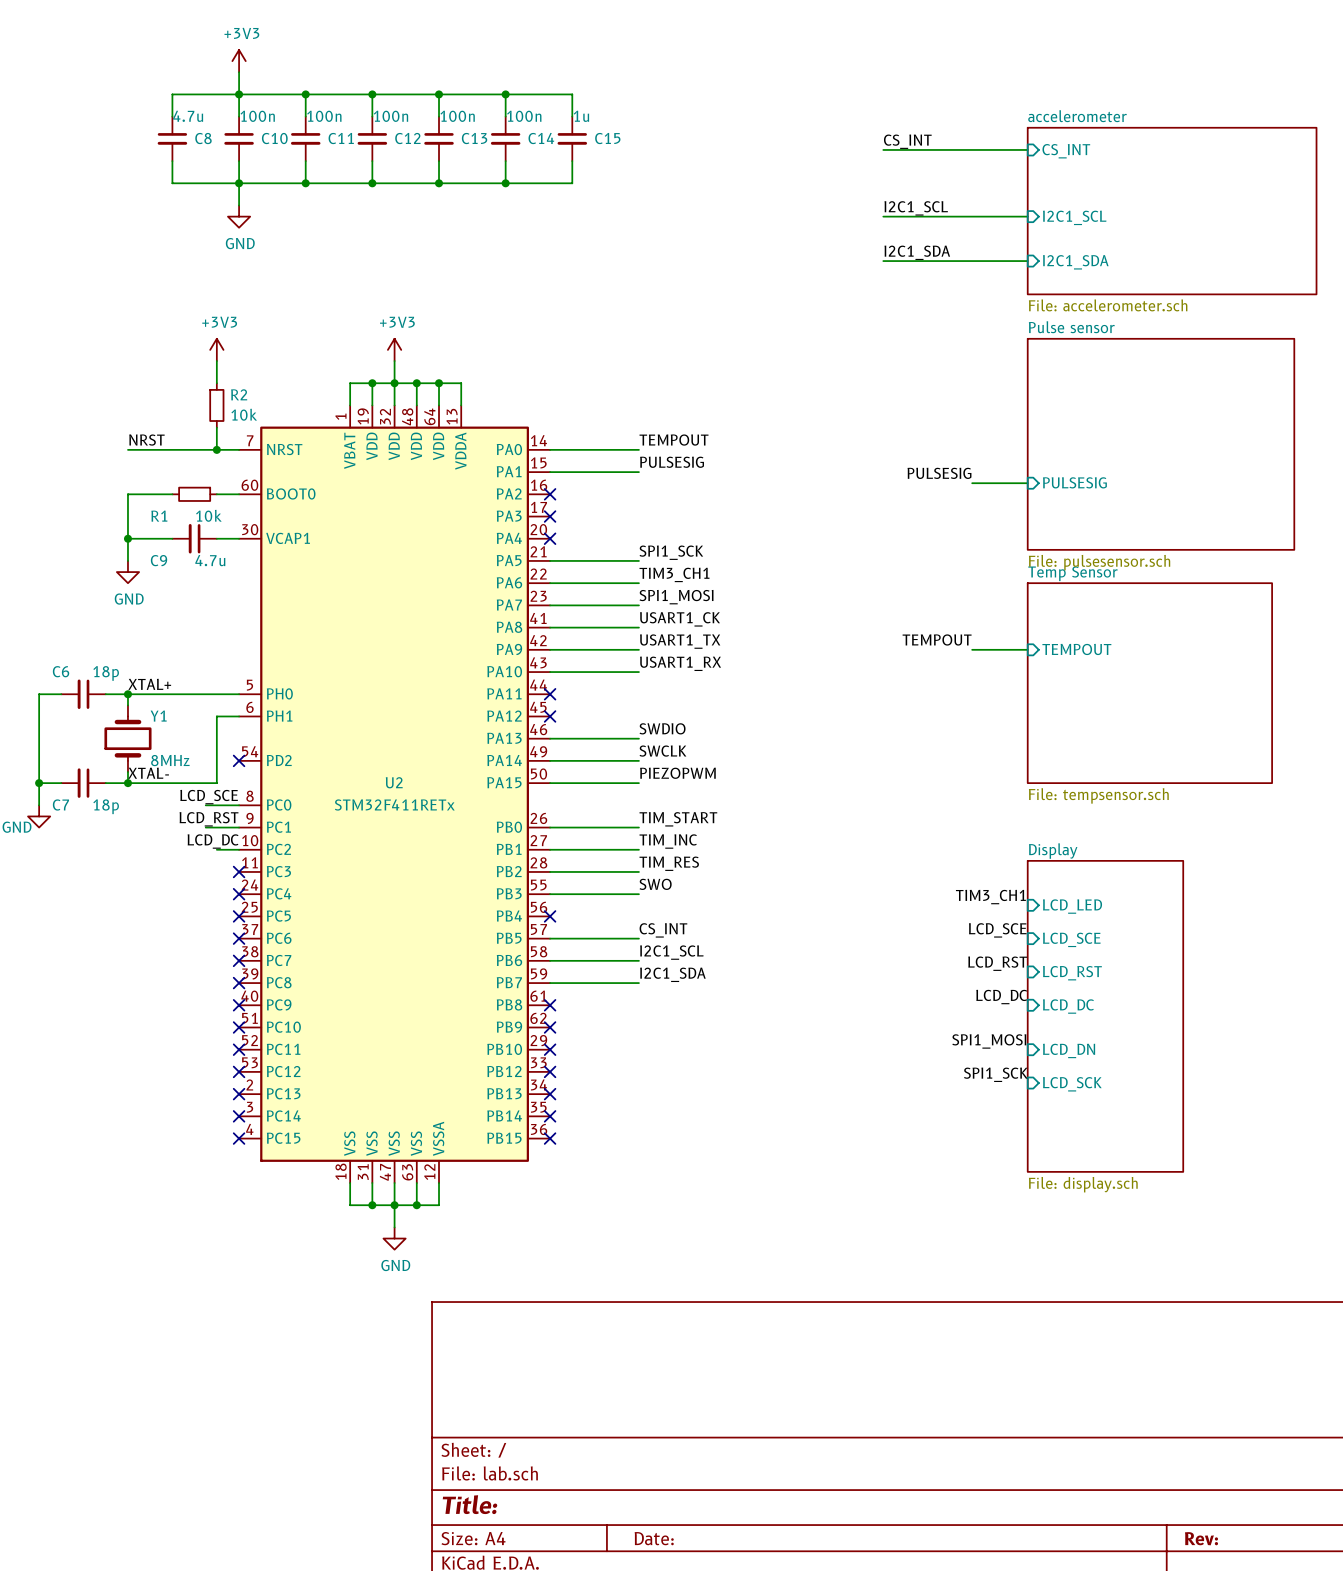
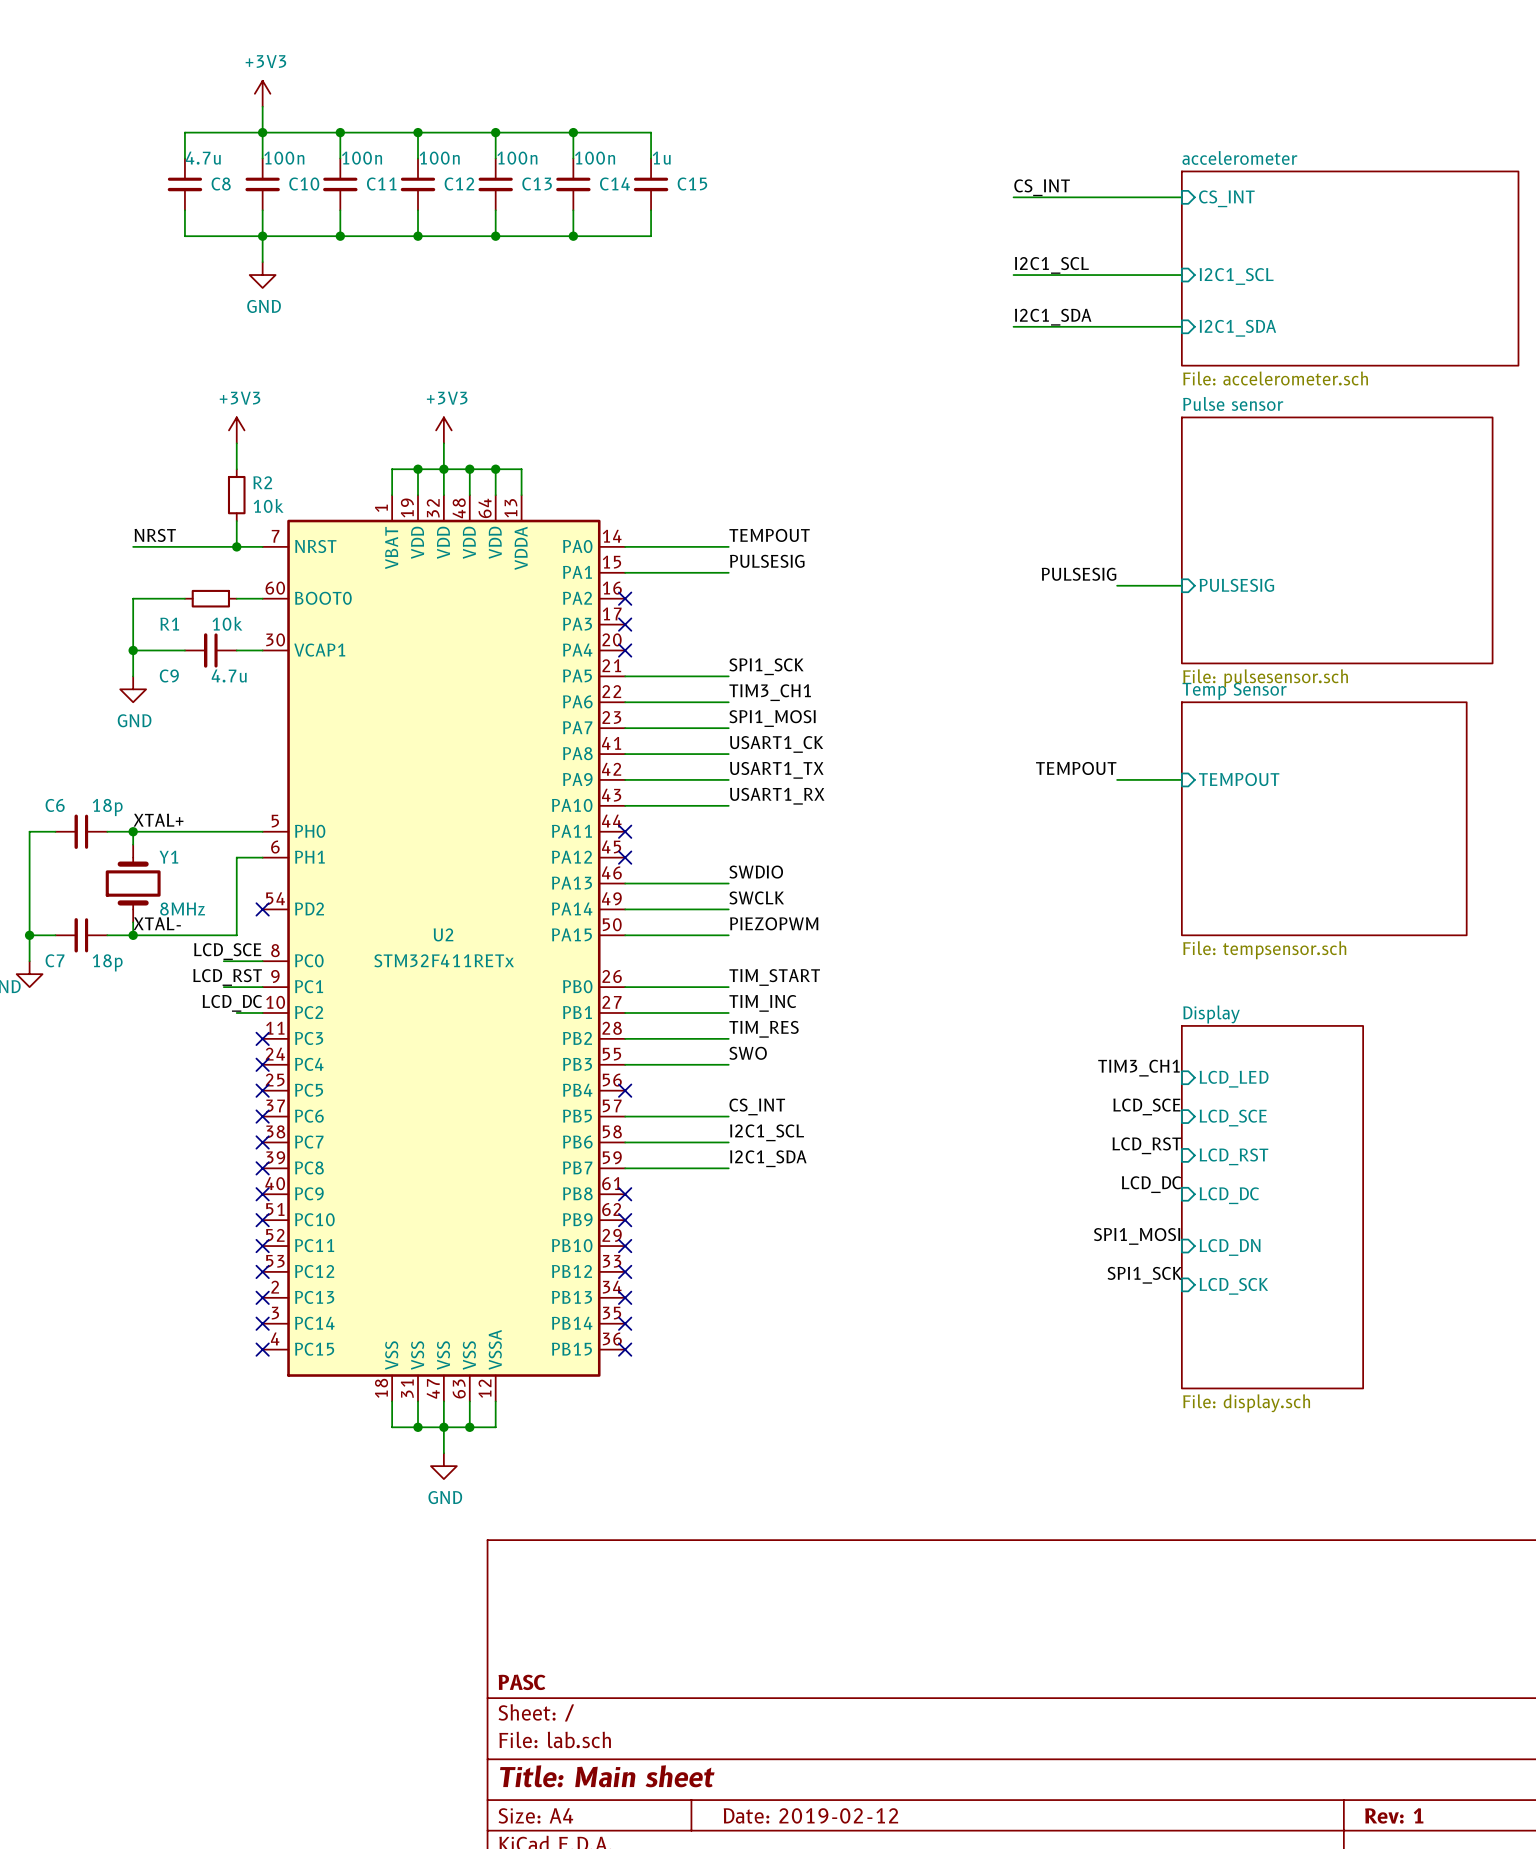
title block: none -> PASC (521, 1682)
title block: Title: (470, 1504) -> Title: Main sheet (607, 1776)
title block: Date: (654, 1538) -> Date: 2019-02-12 (810, 1815)
title block: Rev: (1201, 1538) -> Rev: 1 (1394, 1815)

